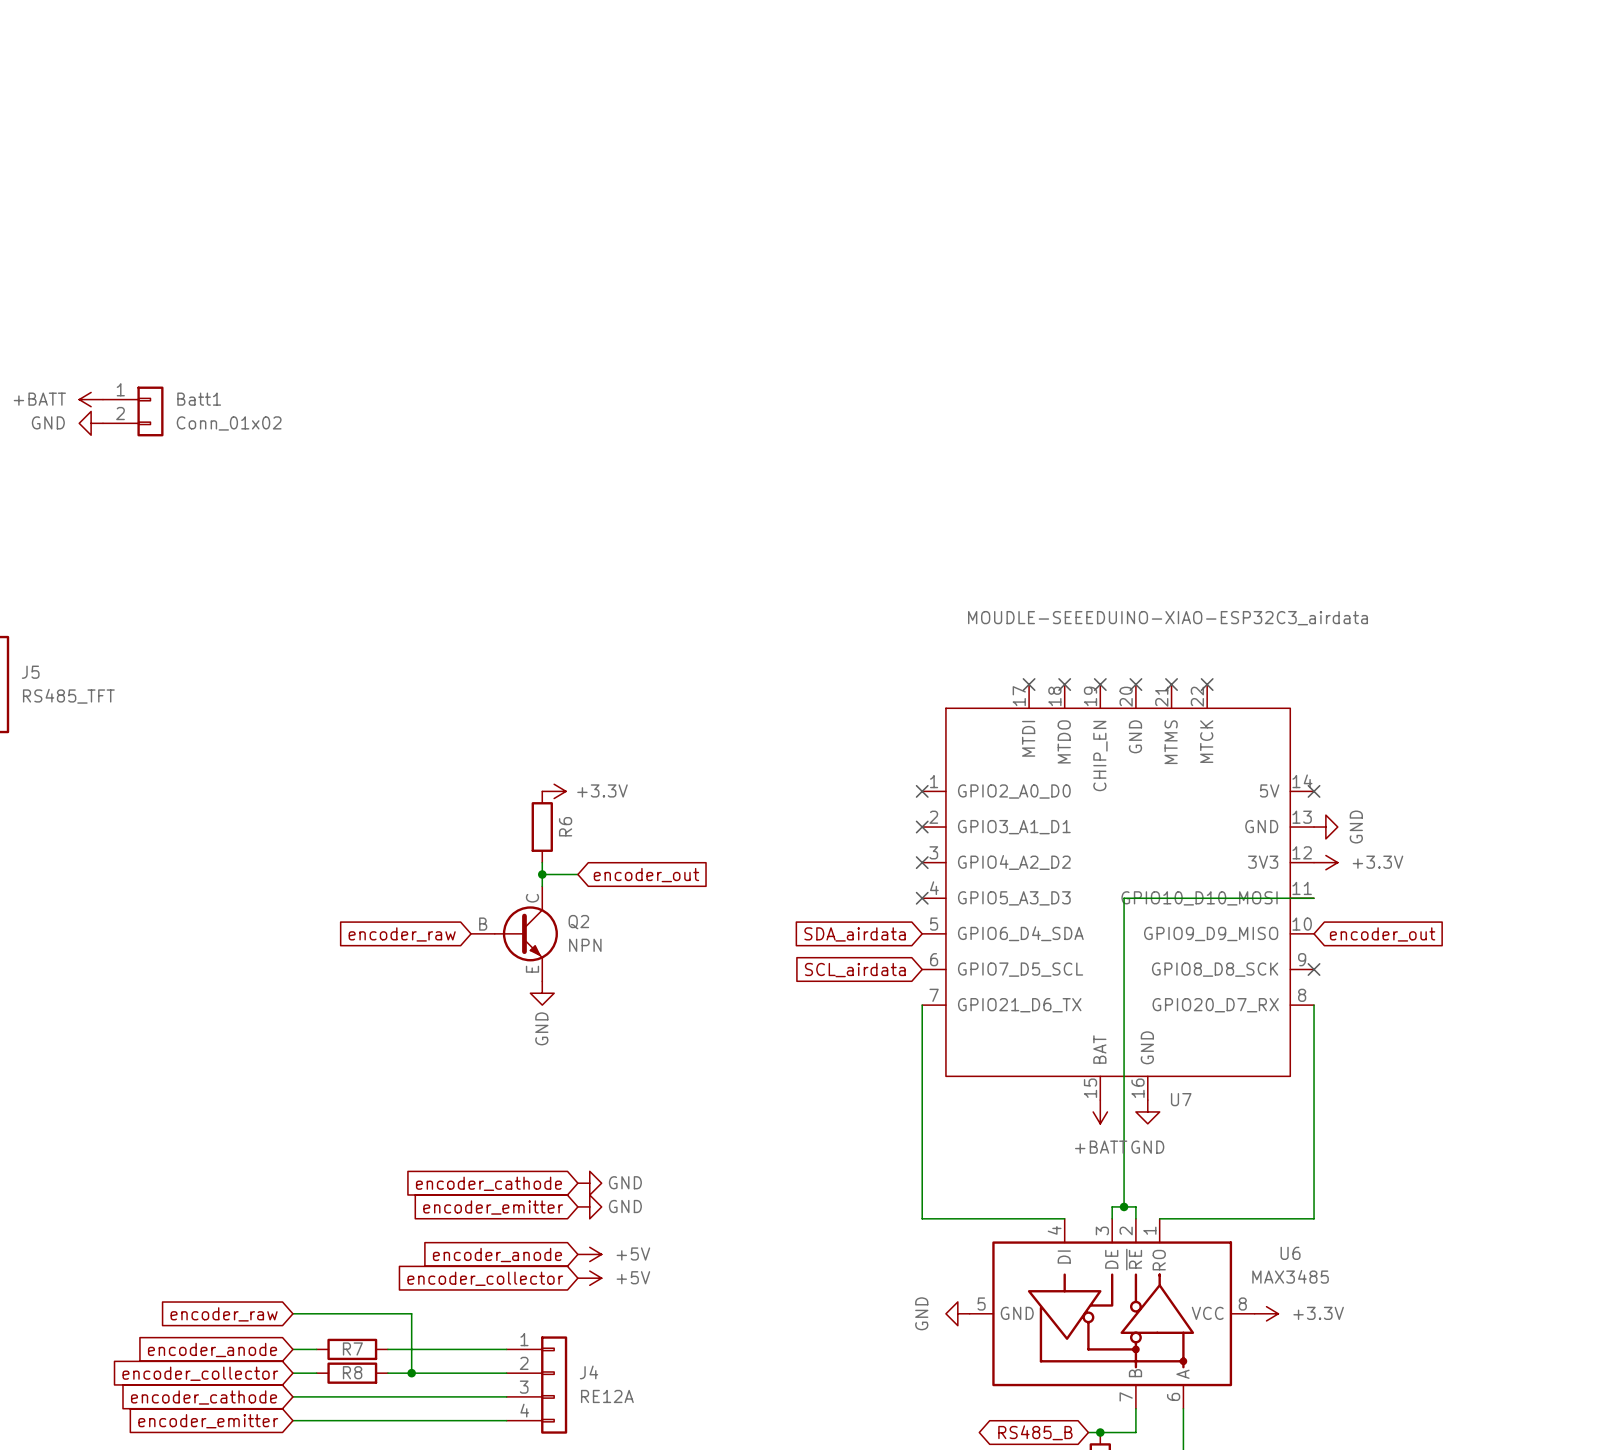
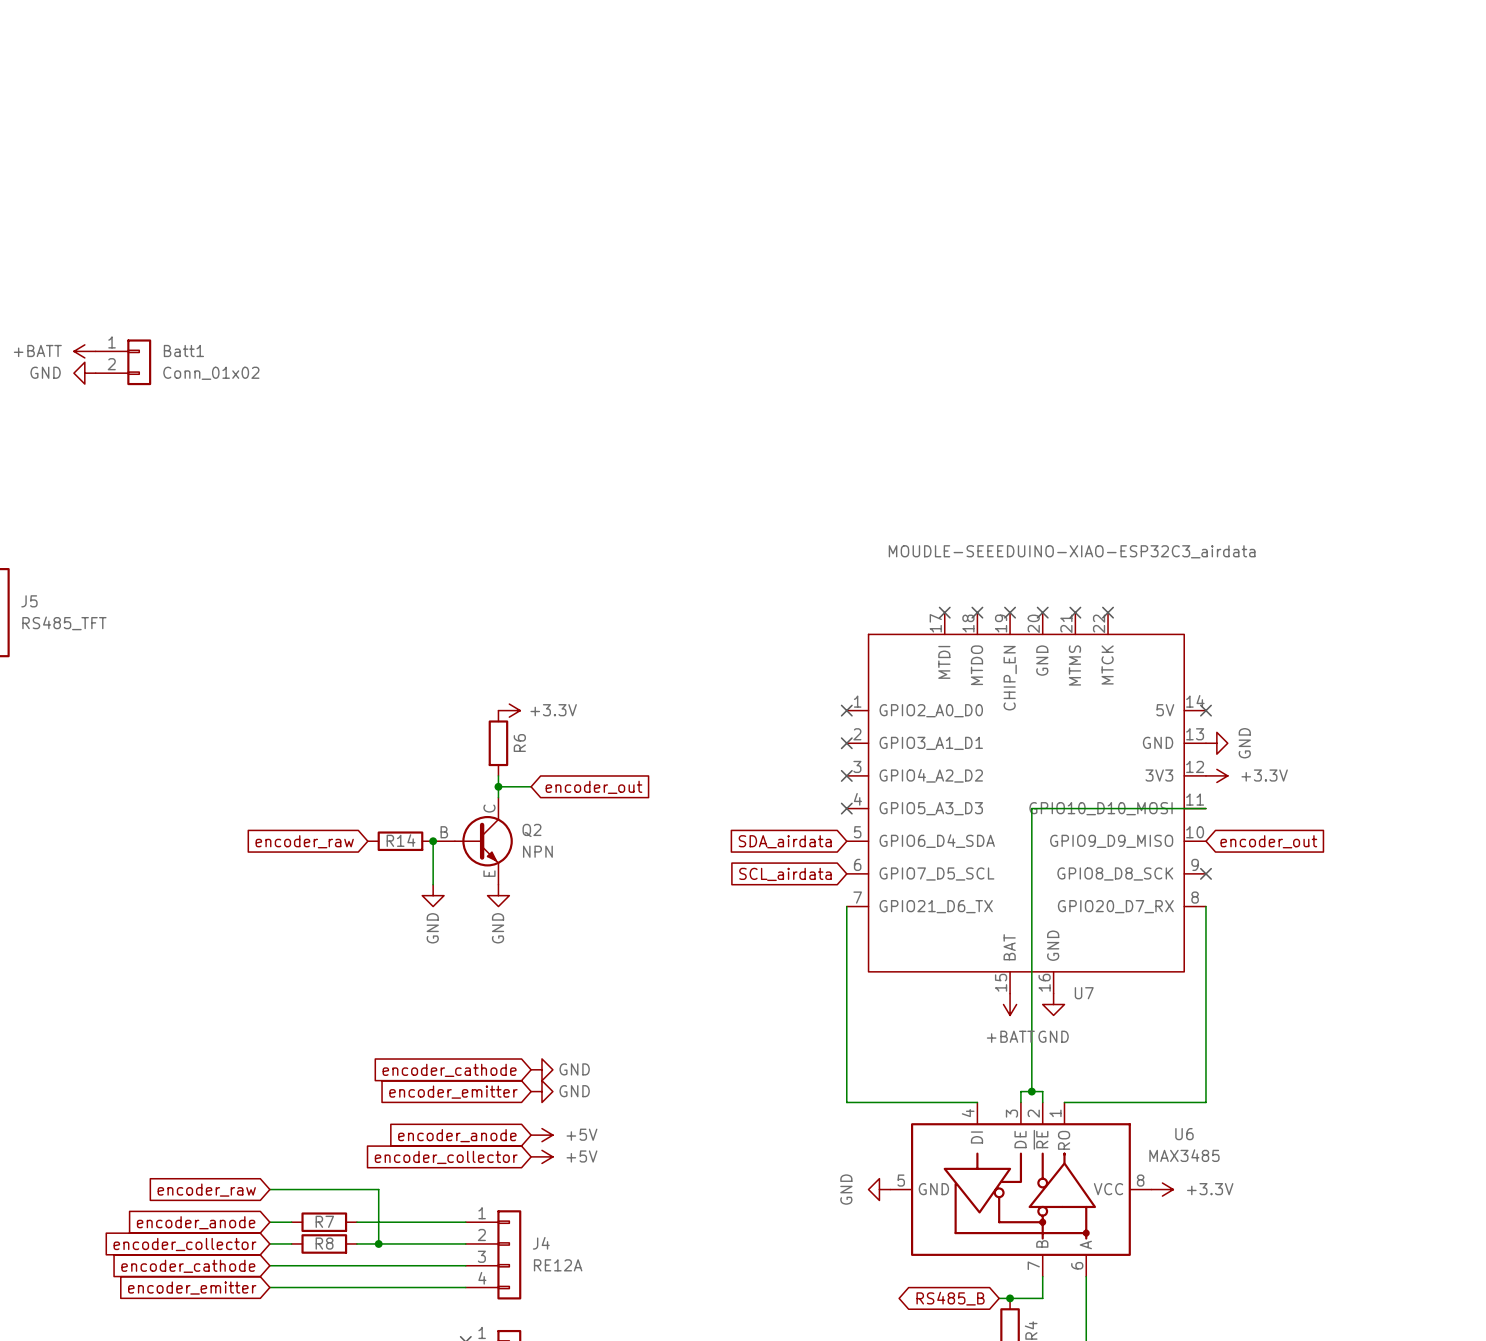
R14: none -> (400, 841)
wire: none -> (433, 841) (433, 884)
junction: none -> (433, 841)
global label position: encoder_raw (402, 934) -> encoder_raw (304, 841)
power symbol: none -> GND (433, 895)

